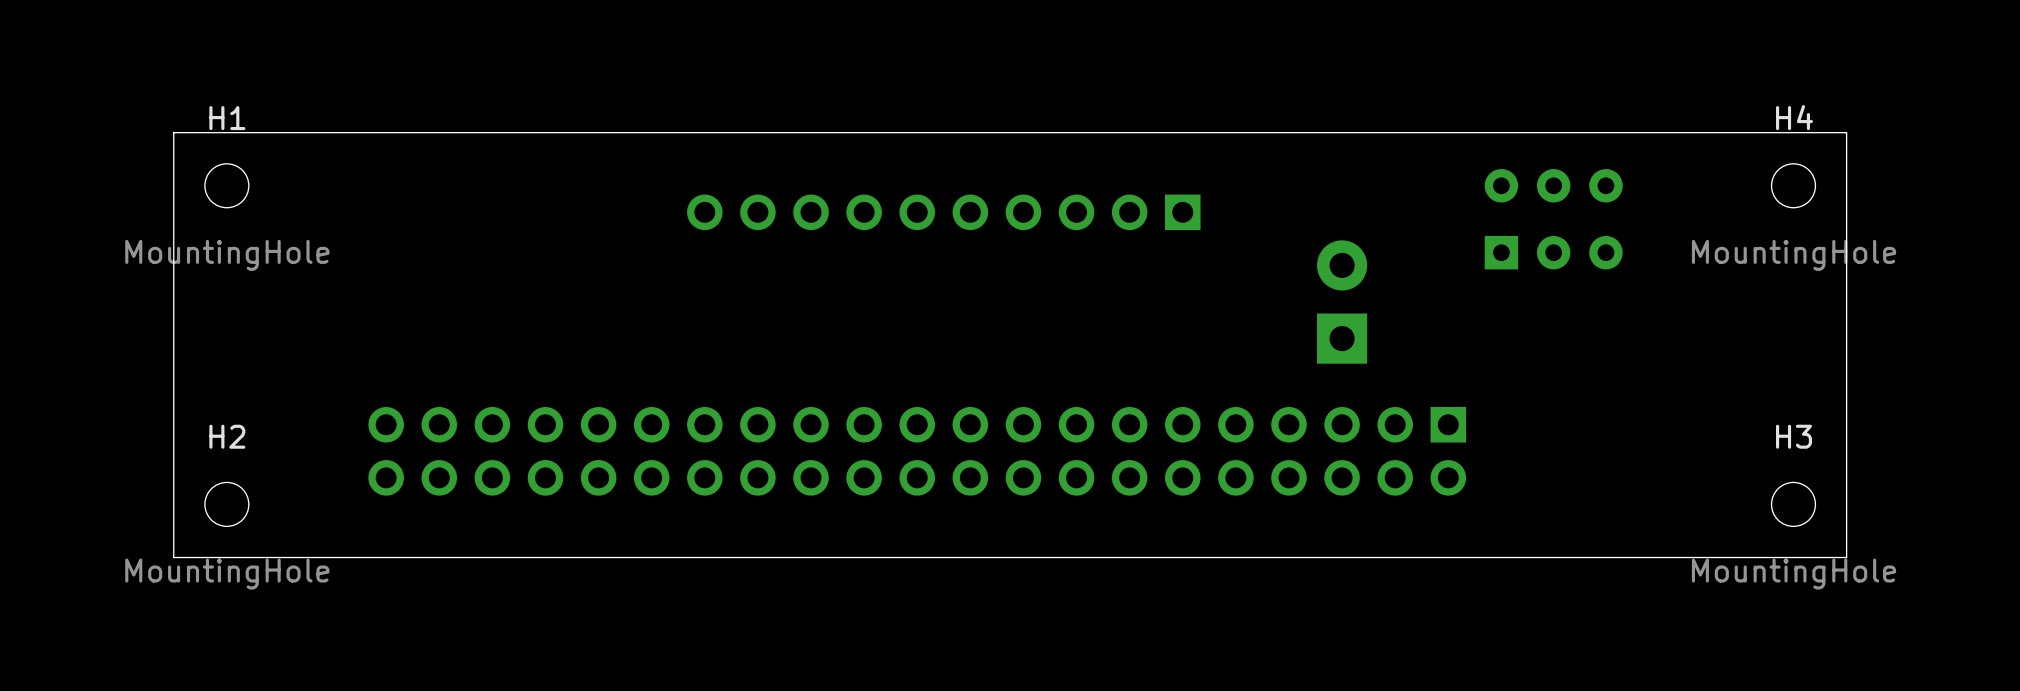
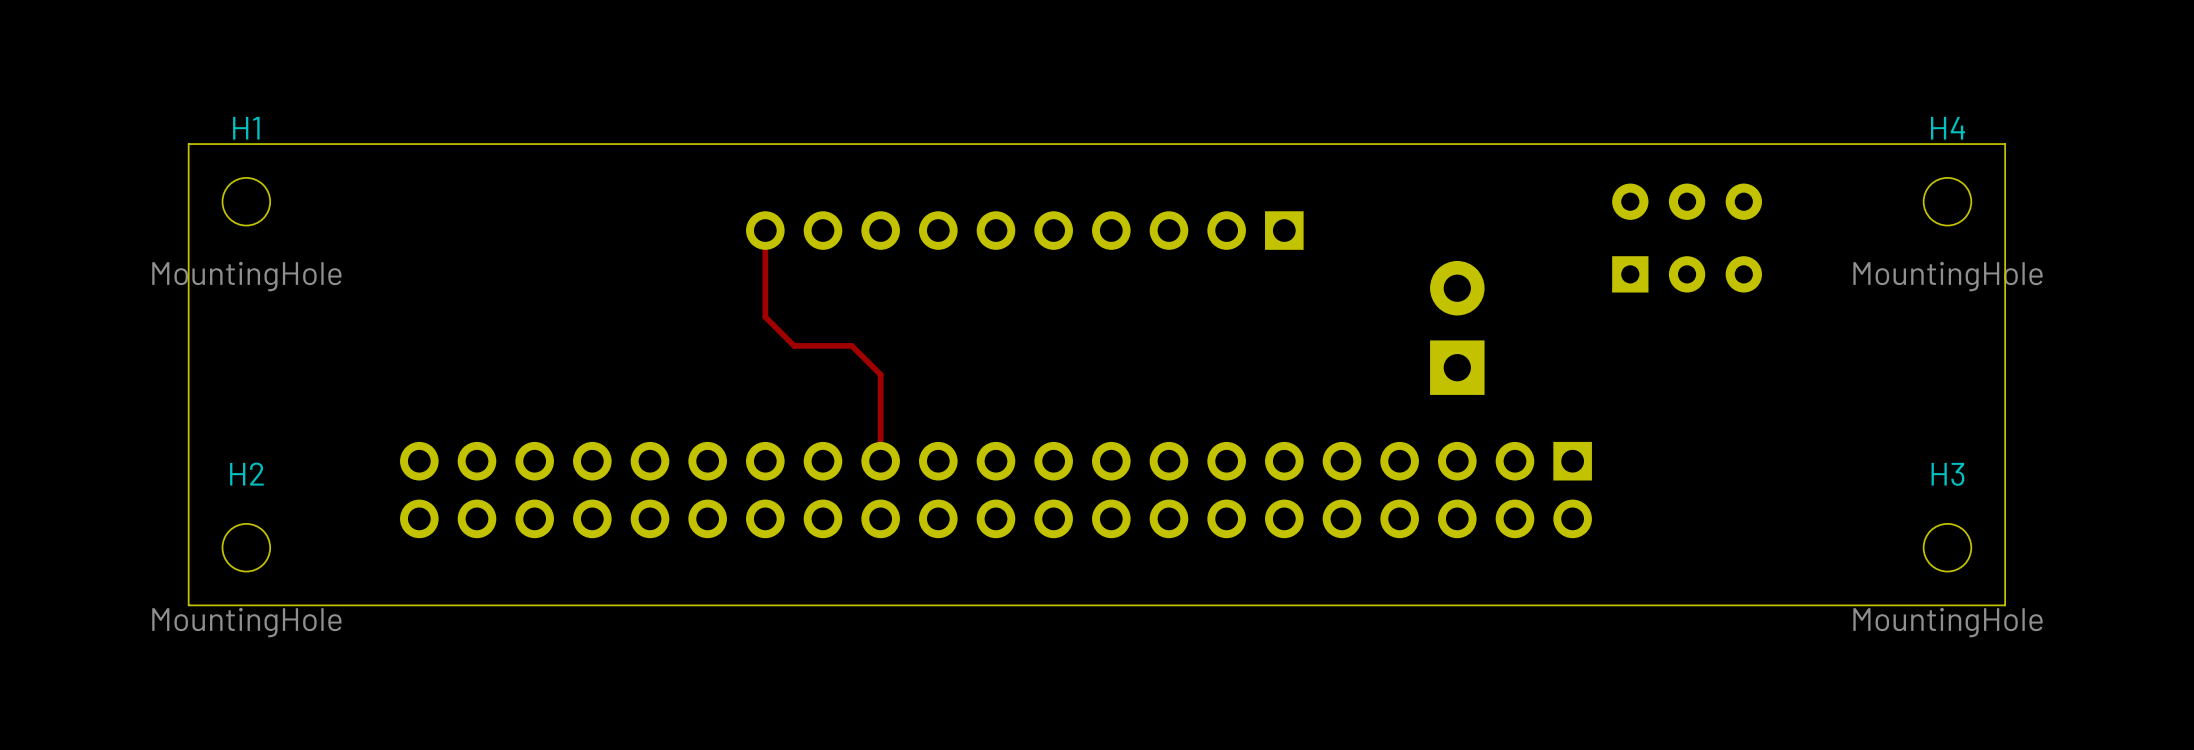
track: none -> (765, 230) (765, 317) (794, 345) (851, 345) (880, 374) (880, 461)

